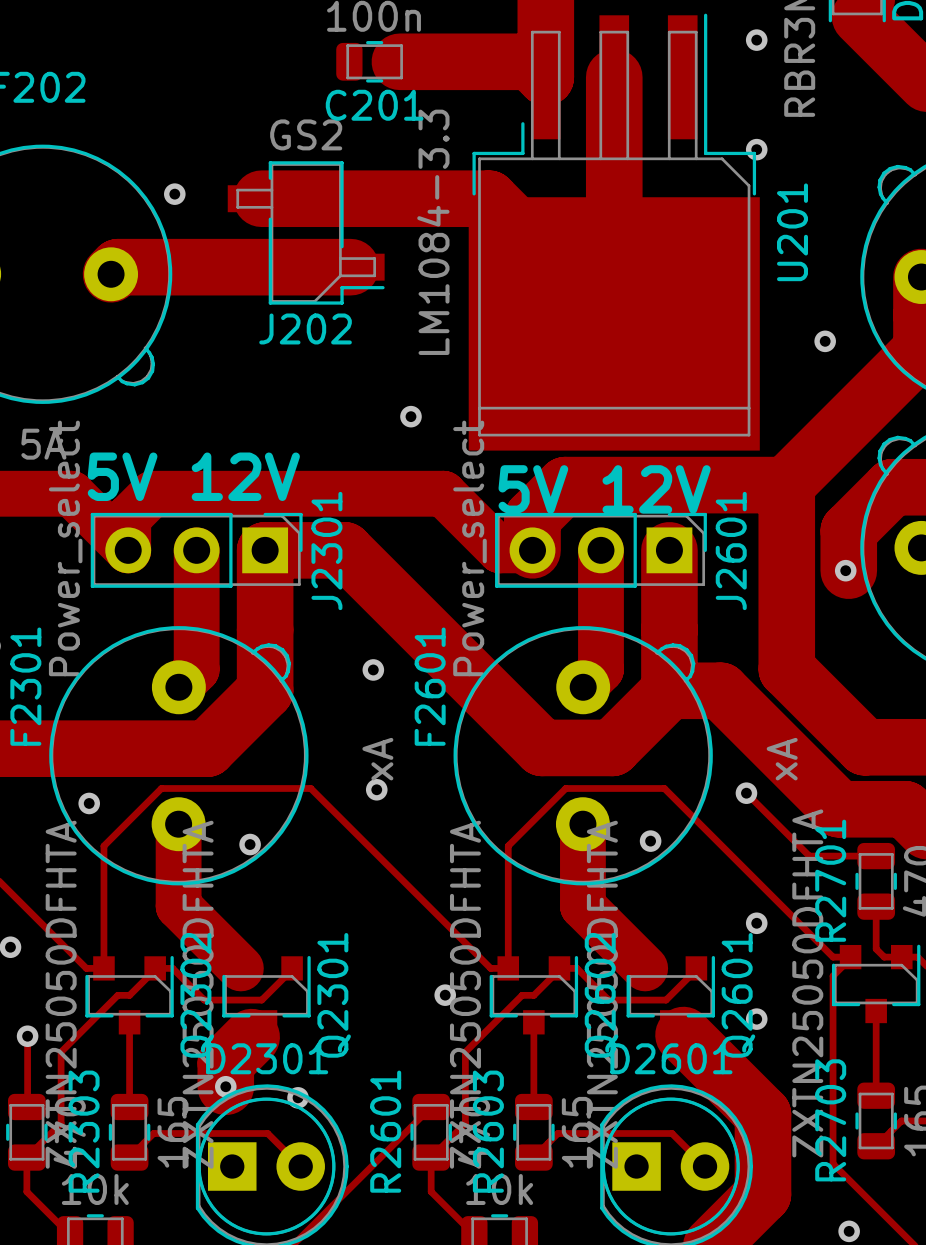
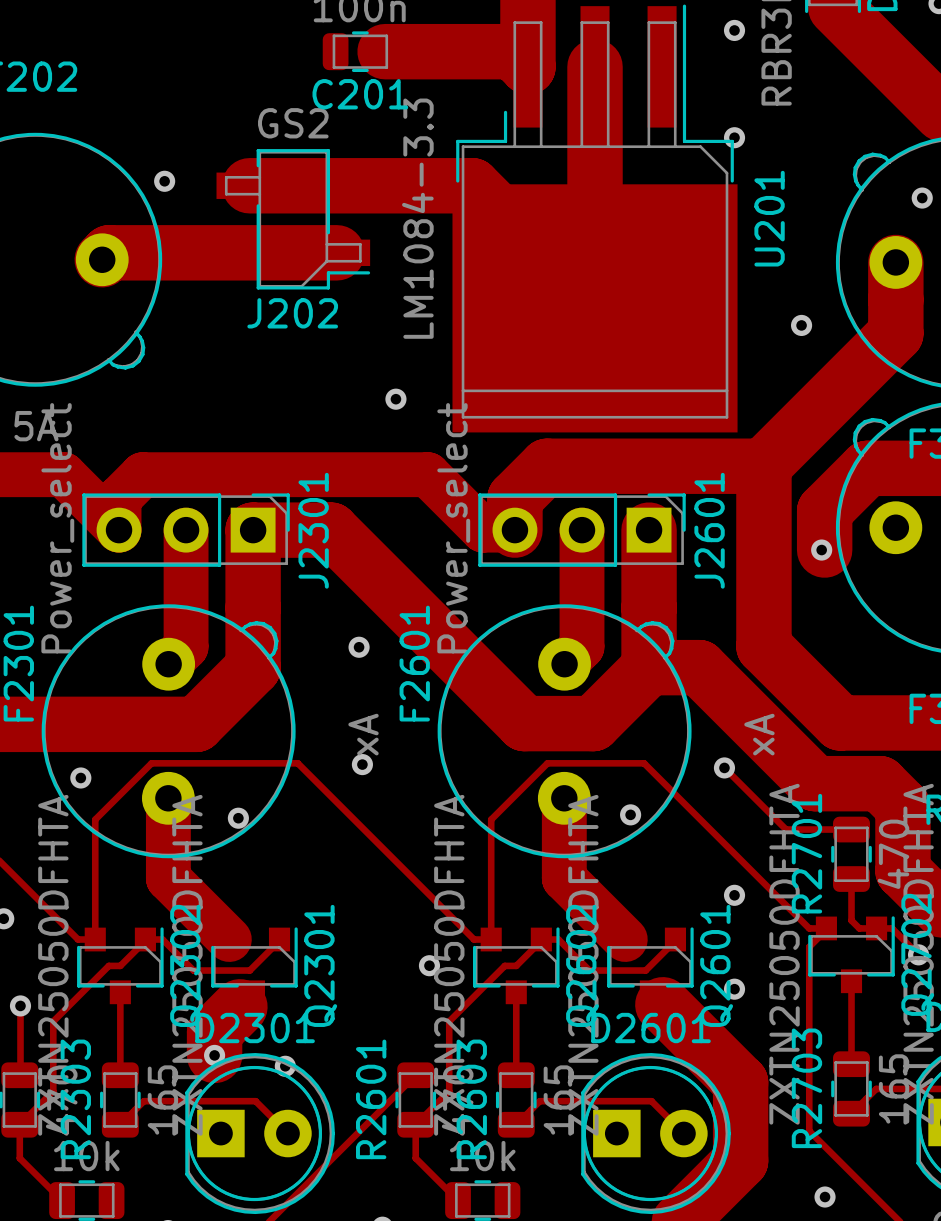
text: 5V 12V (193, 476) -> none
text: 5V 12V (604, 489) -> none

